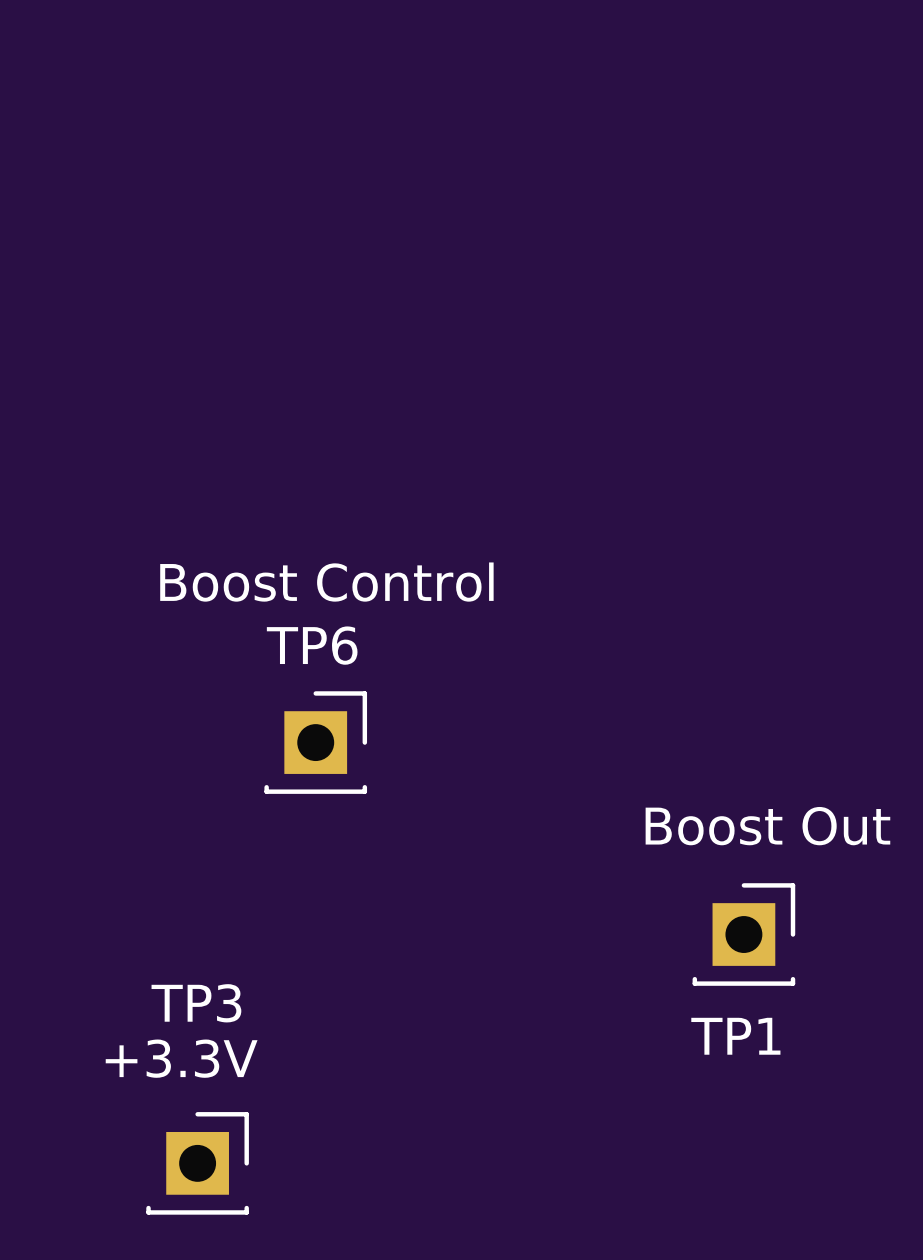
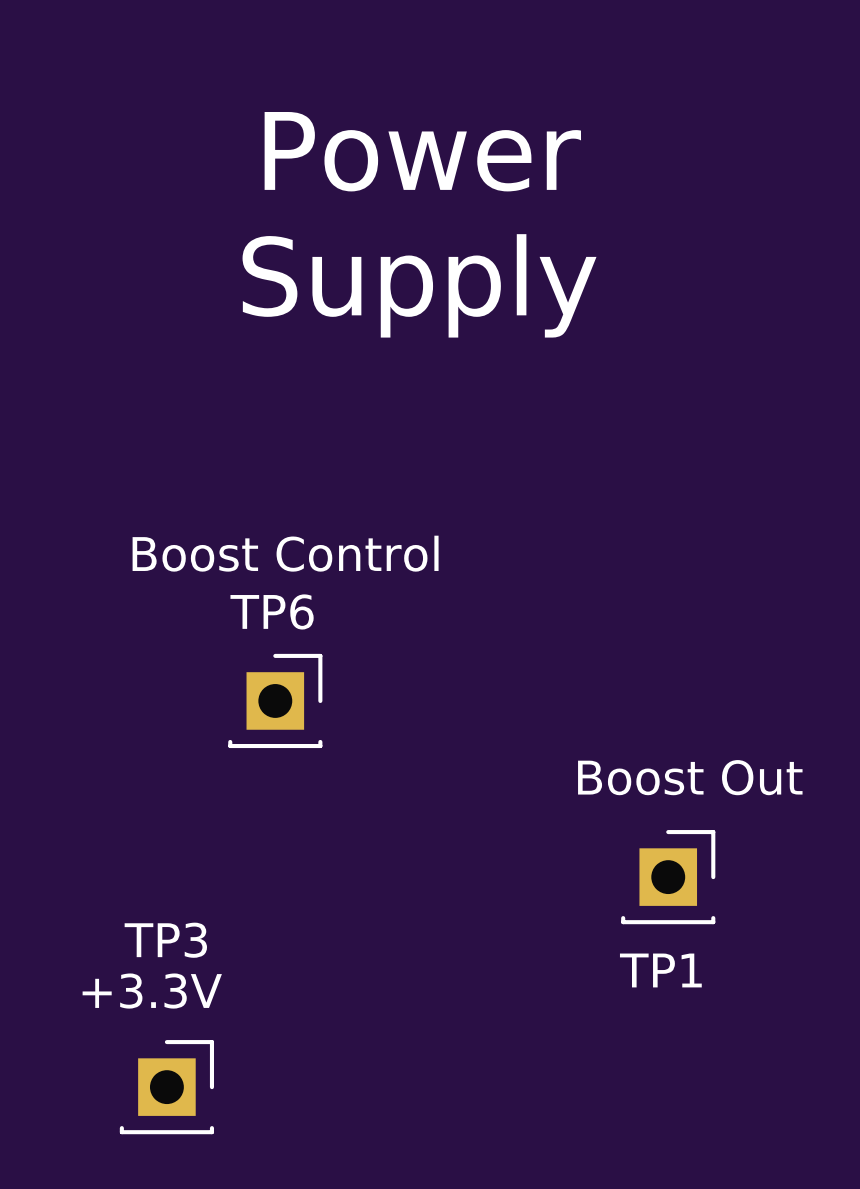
text: none -> Power (422, 151)
text: none -> Supply (419, 285)

